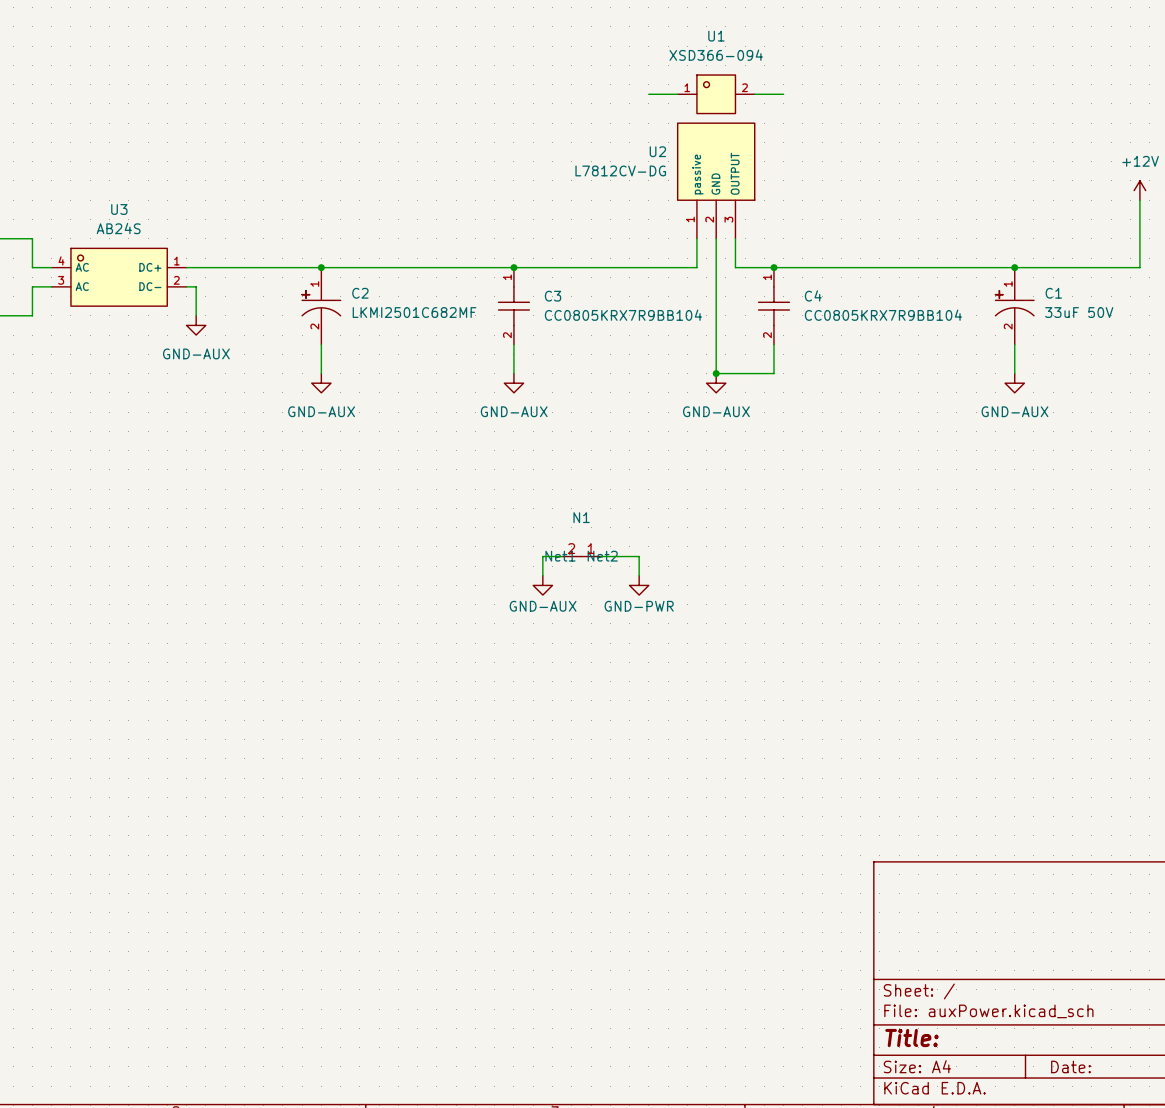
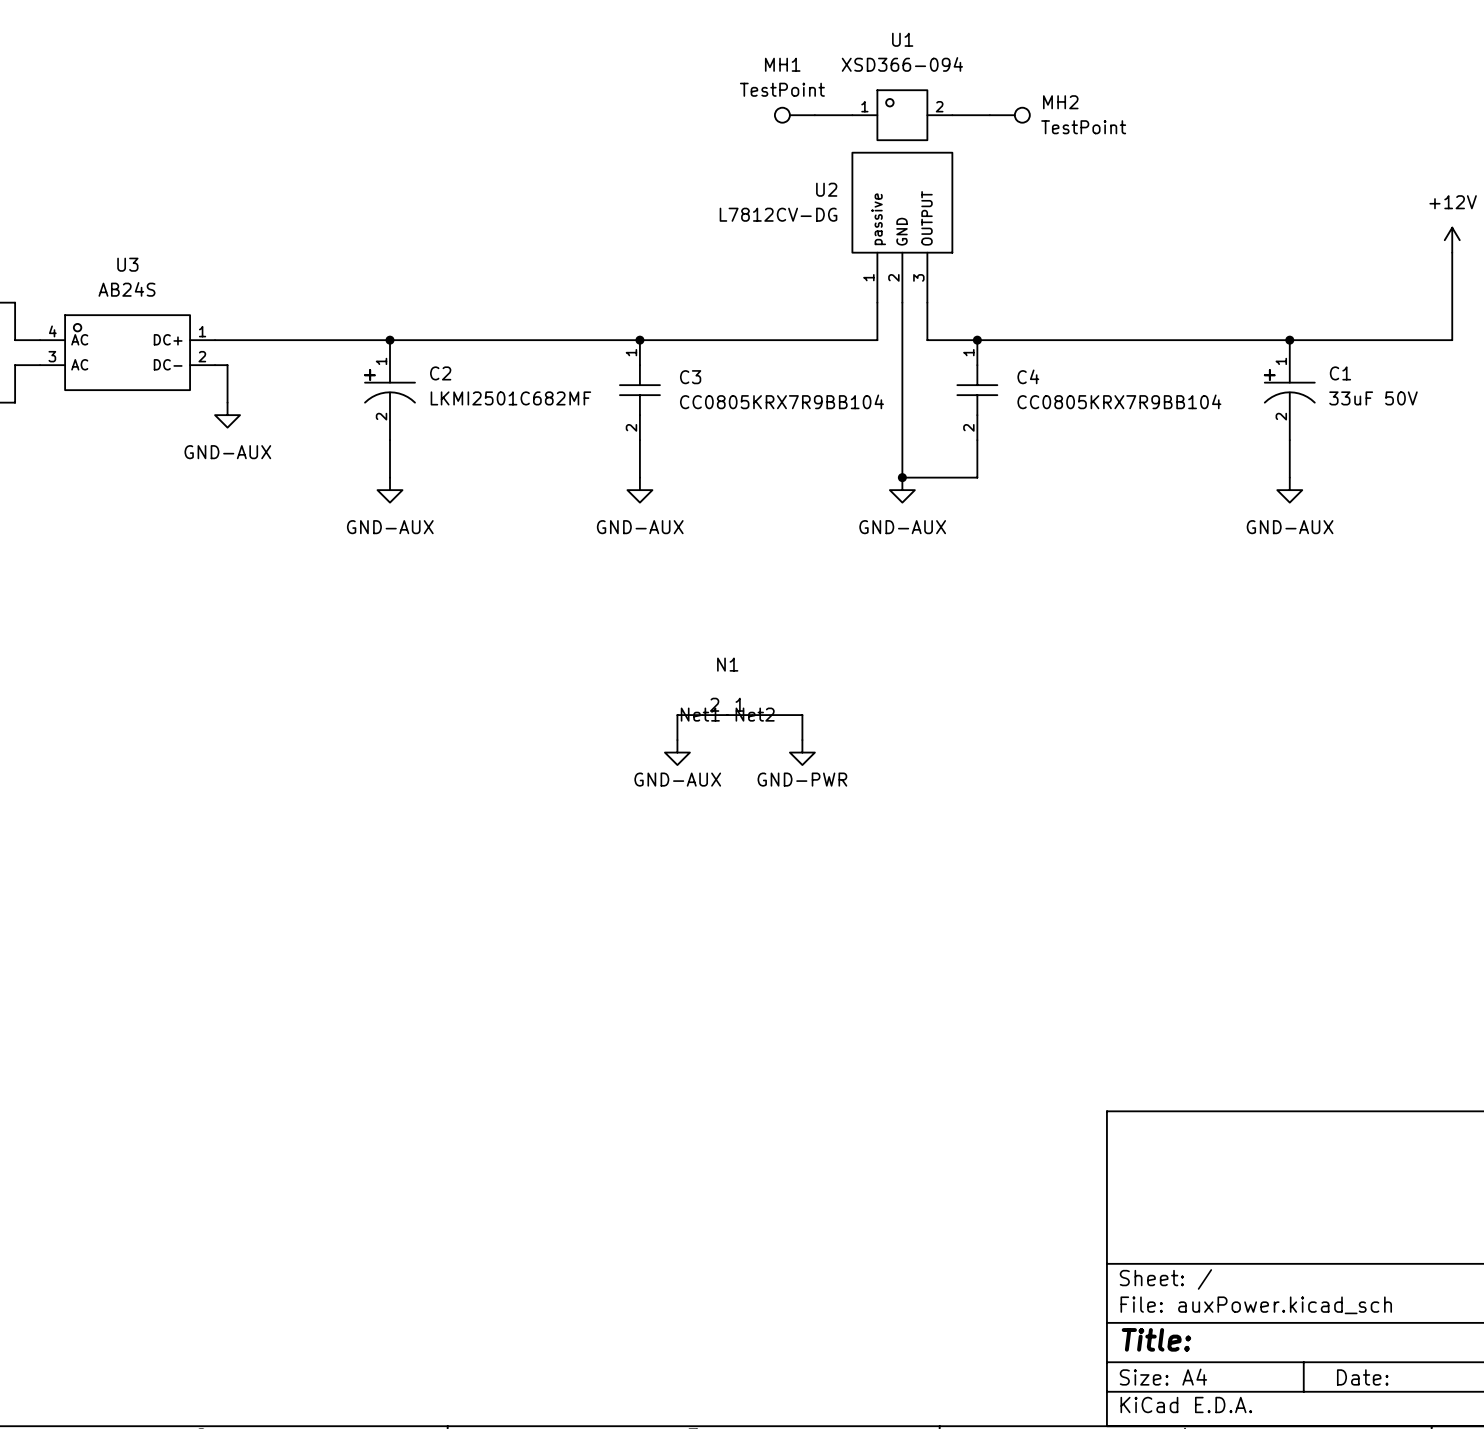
MH1: none -> TestPoint (794, 115)
MH2: none -> TestPoint (1009, 115)

